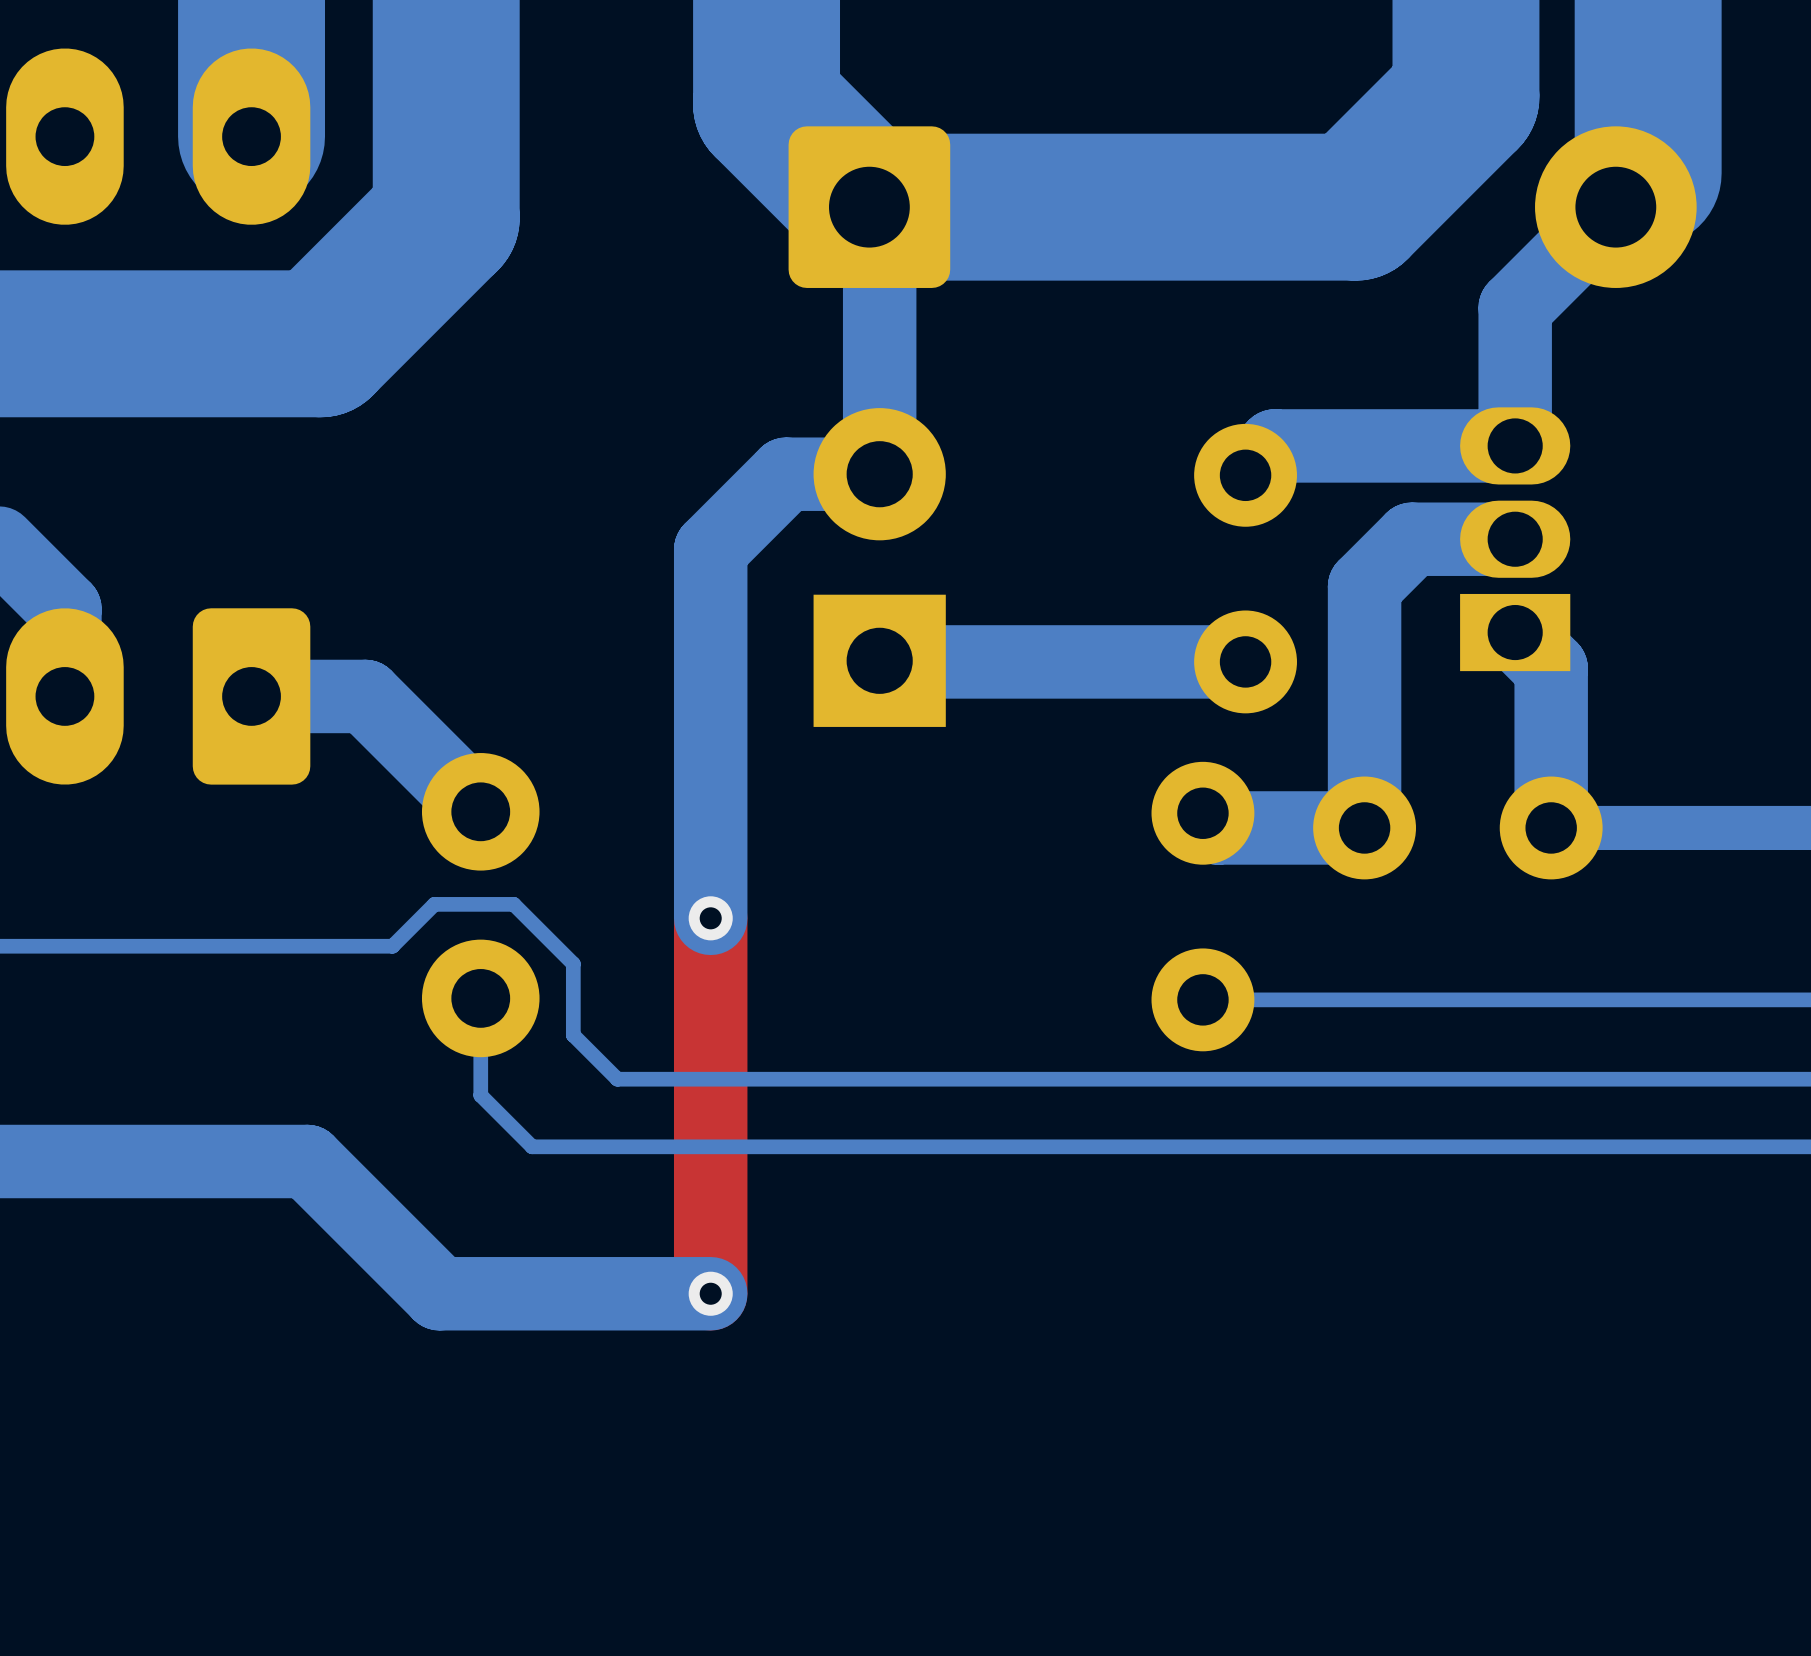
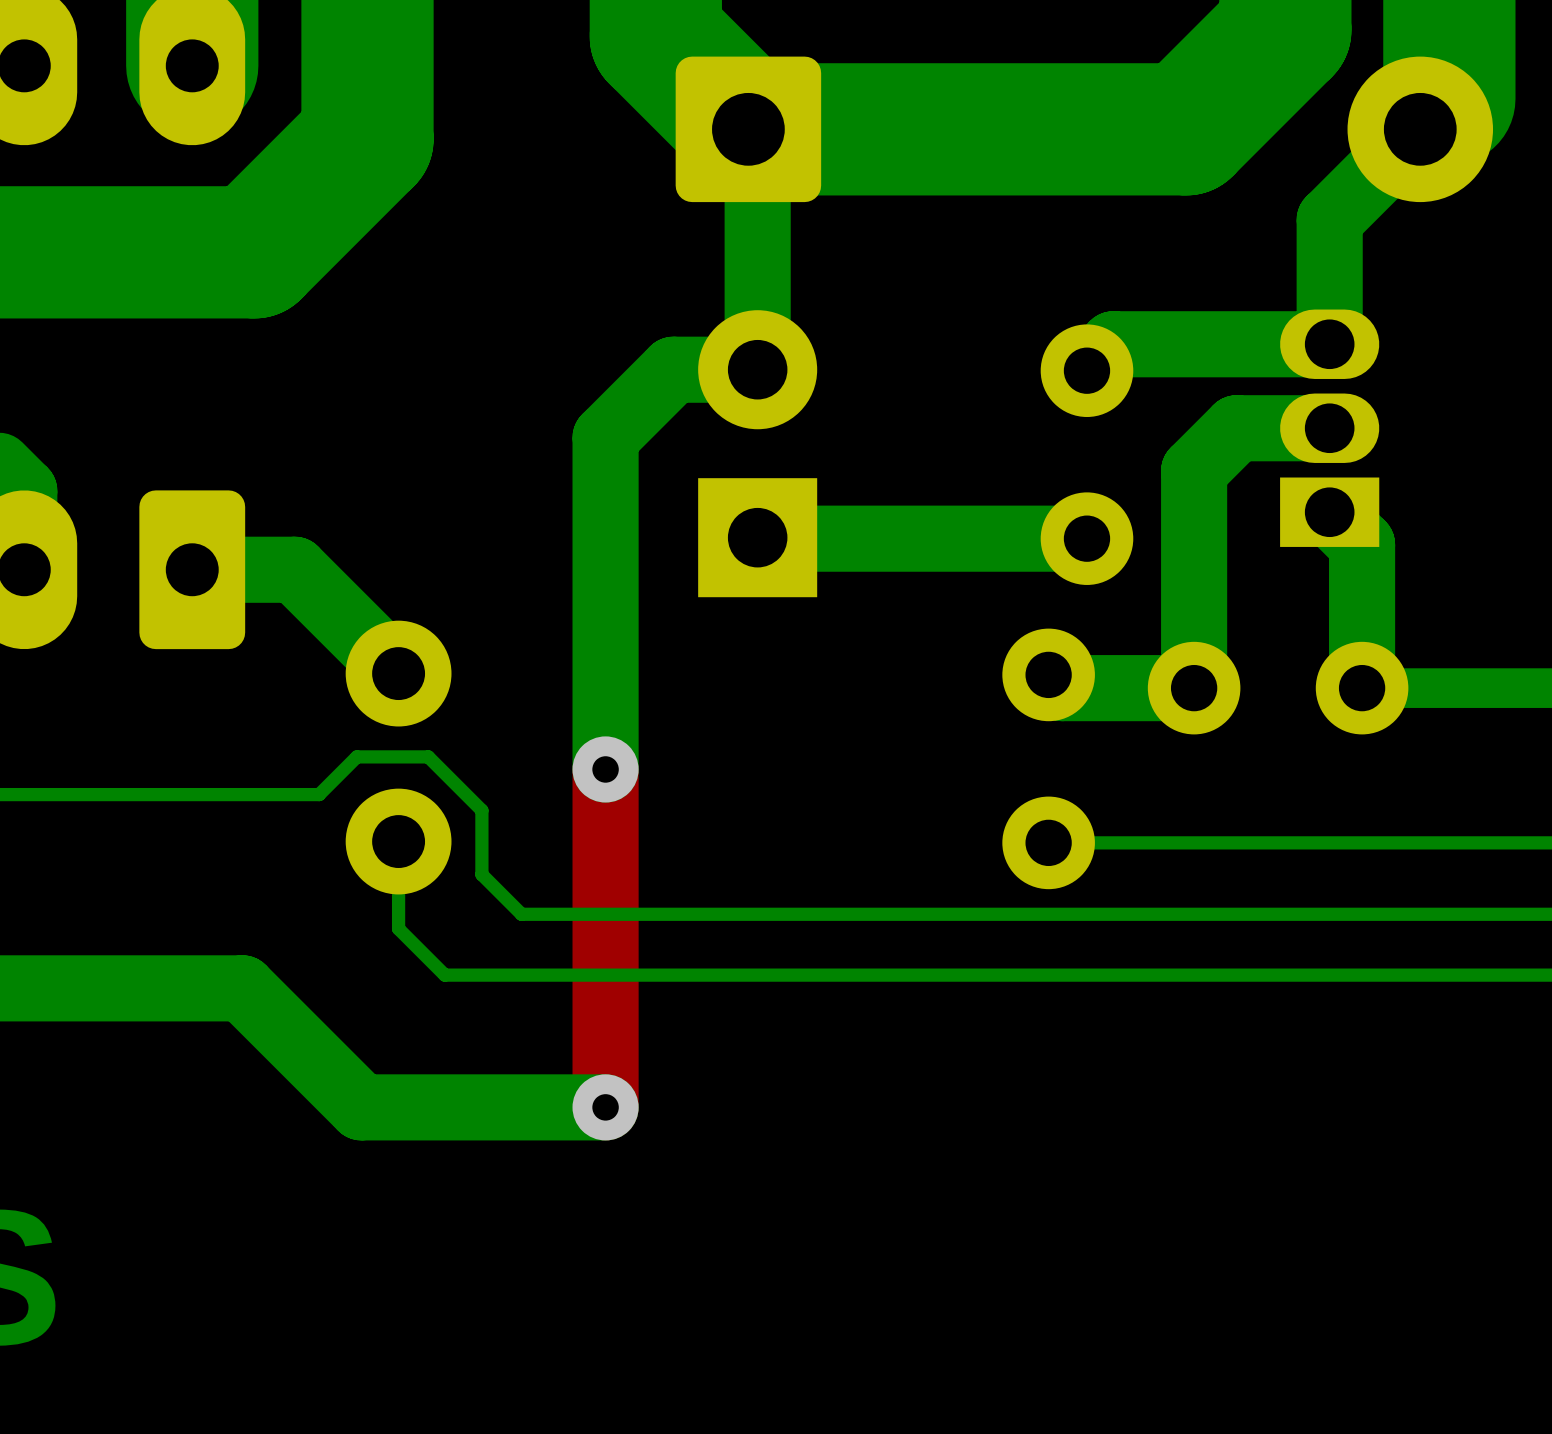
via size: [688, 896, 733, 941] -> [572, 736, 639, 803]
via size: [688, 1271, 733, 1316] -> [572, 1074, 639, 1141]

